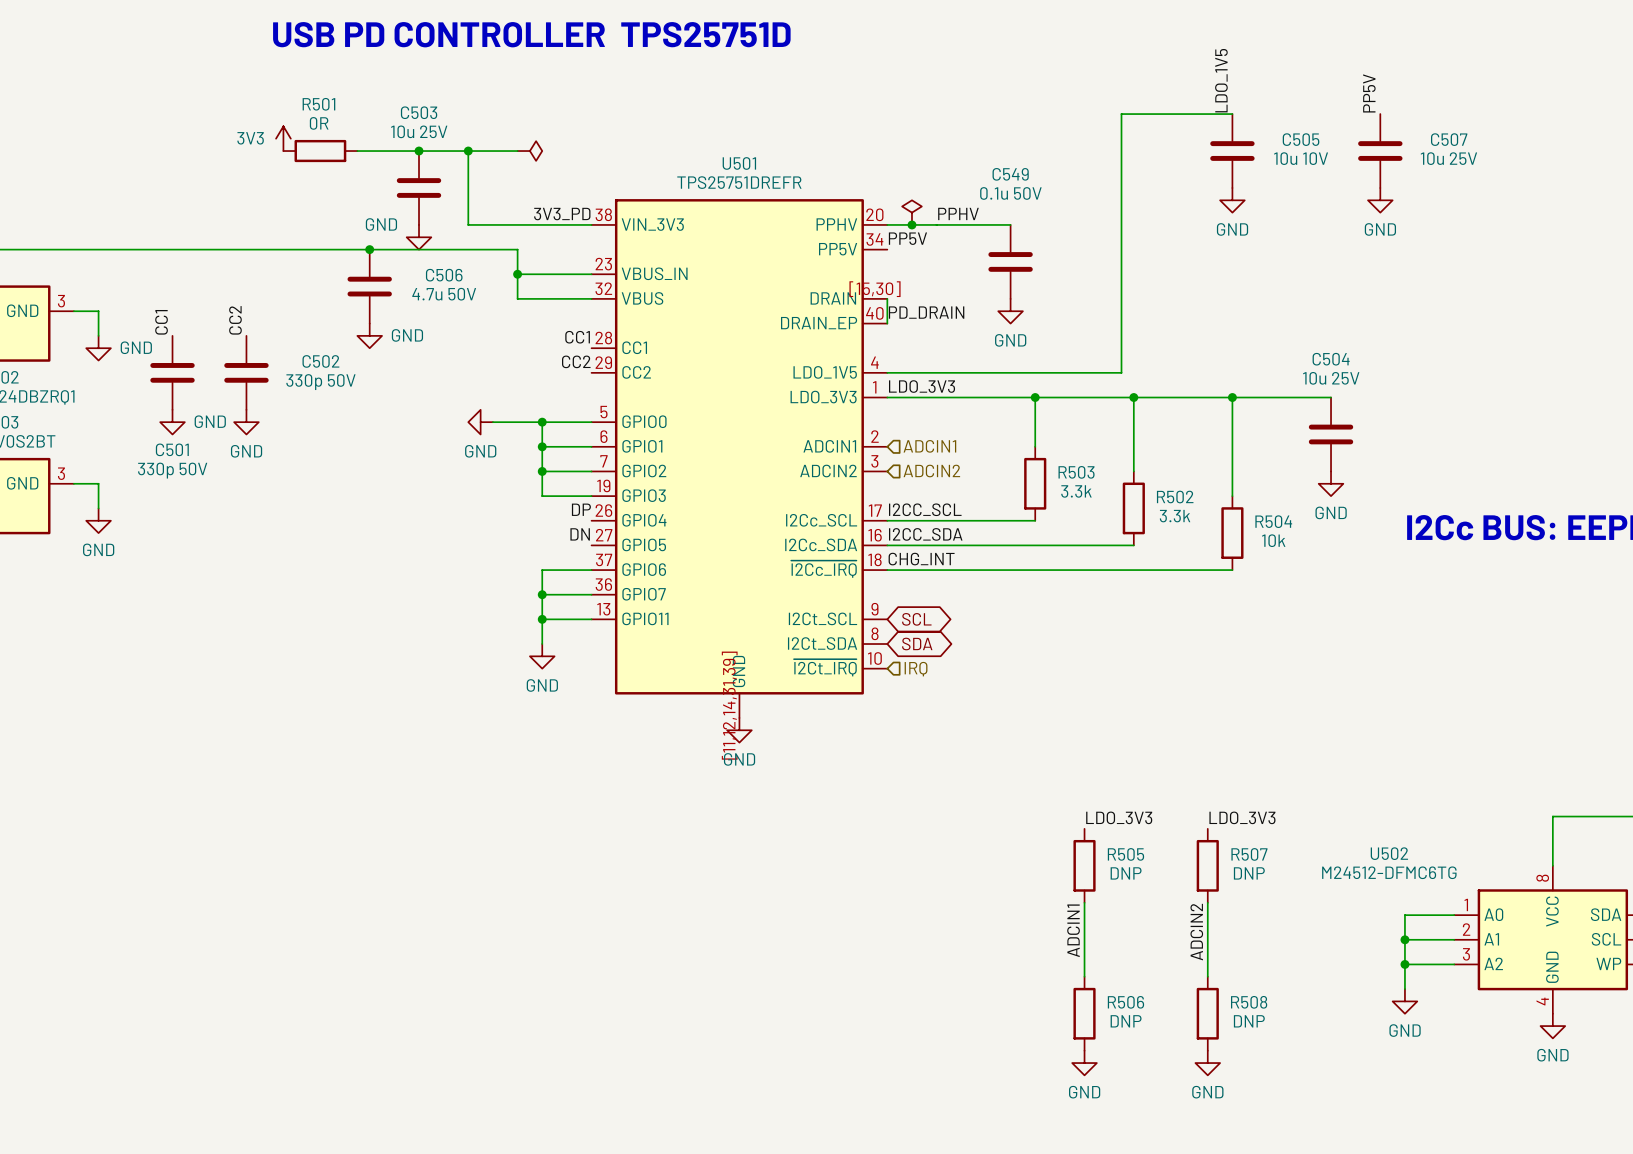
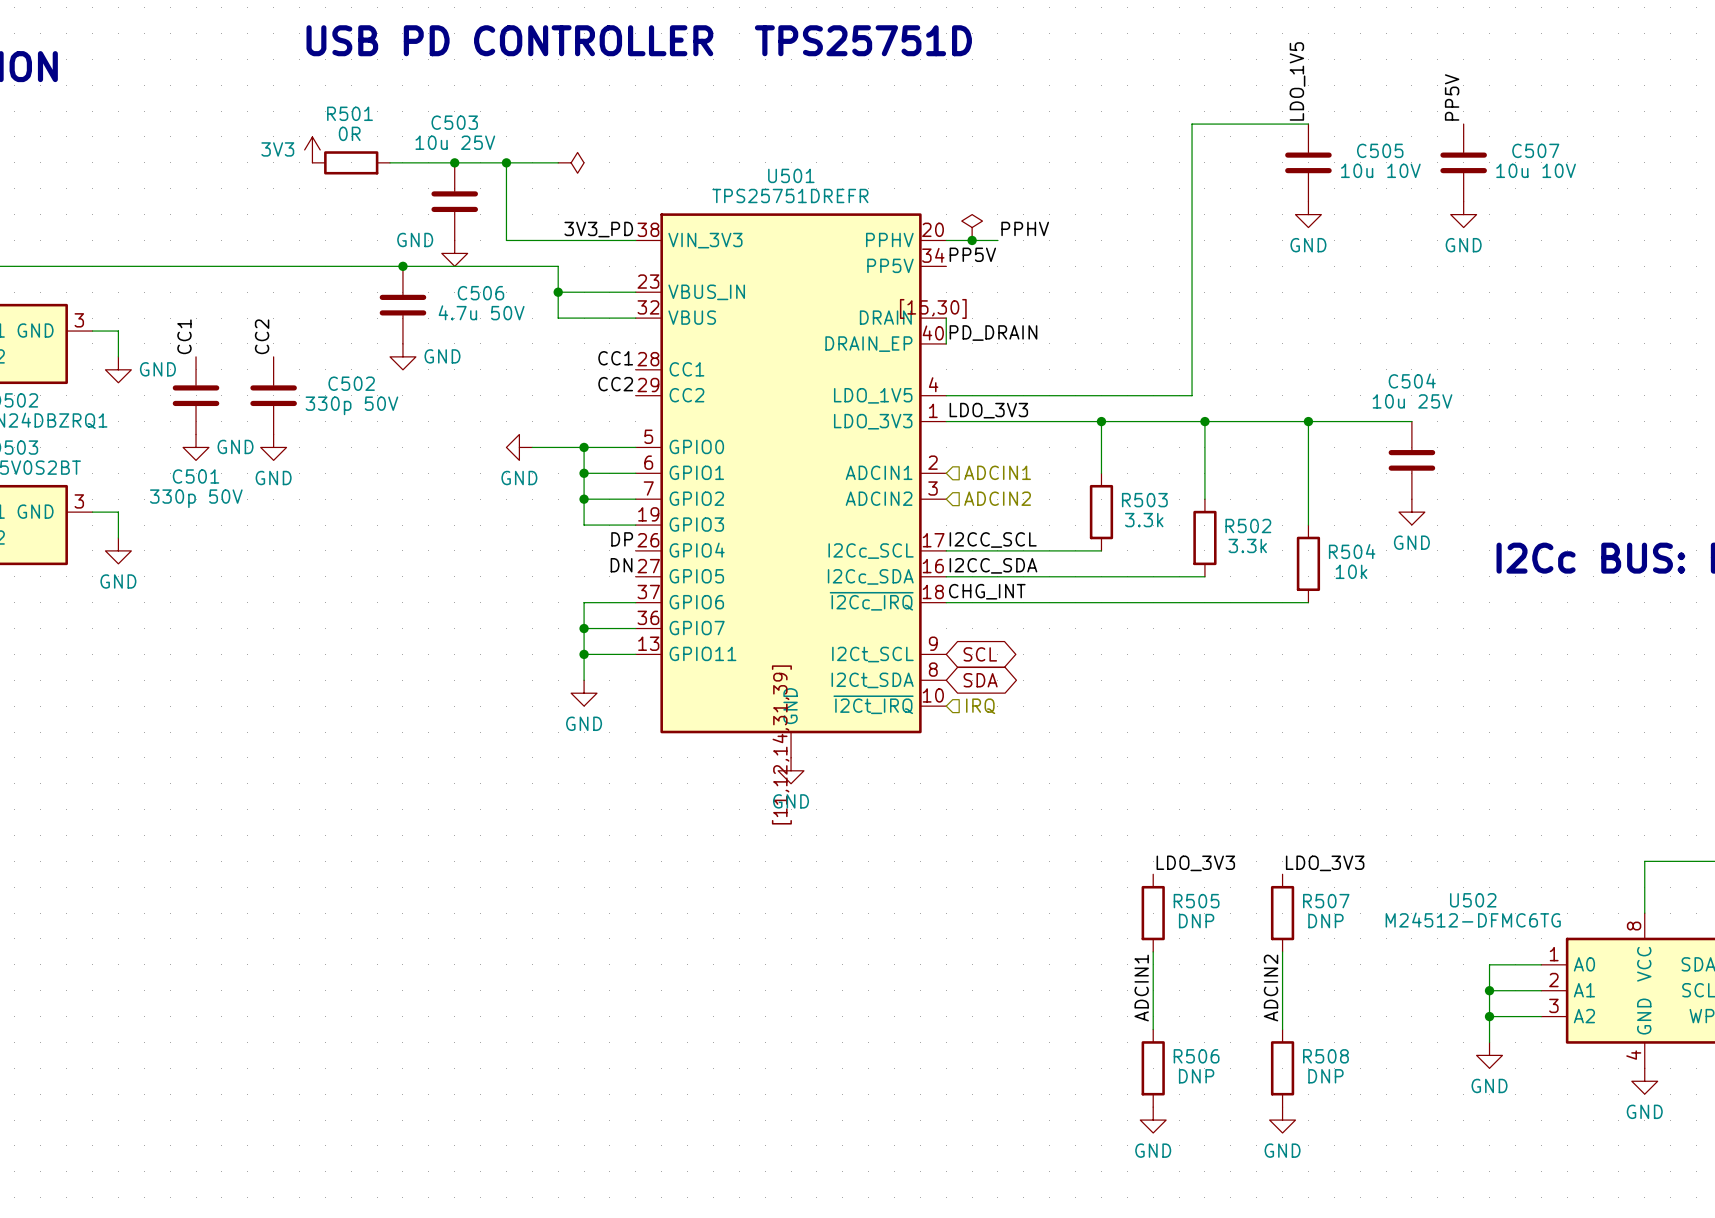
C507 value: 10u 25V (1448, 158) -> 10u 10V (1536, 170)
wire: (936, 224) (1010, 224) -> none
C549: 0.1u 50V (1010, 261) -> none
power symbol: GND (1010, 311) -> none

